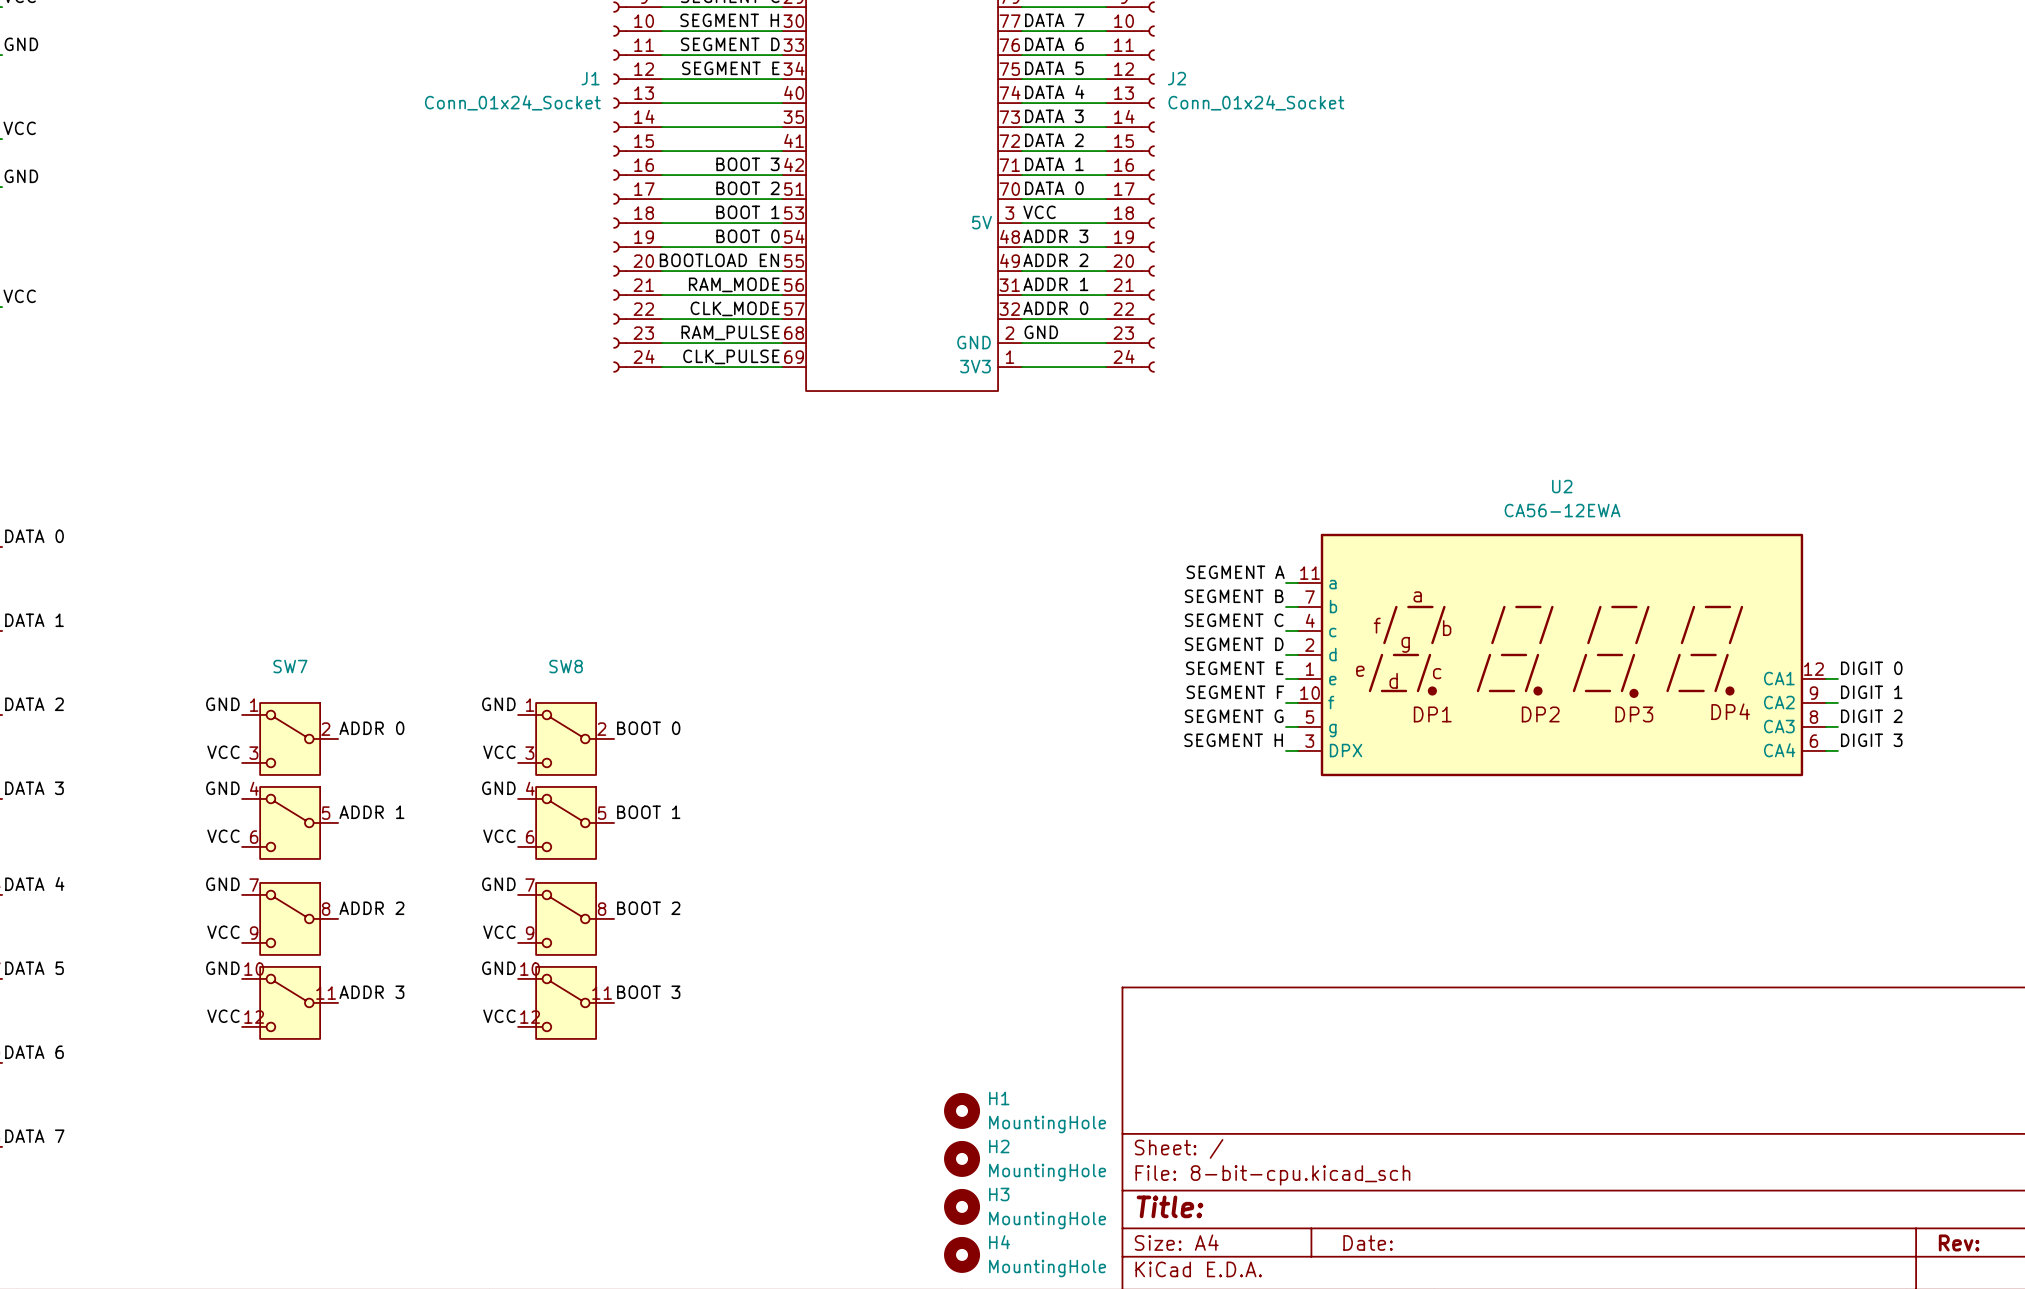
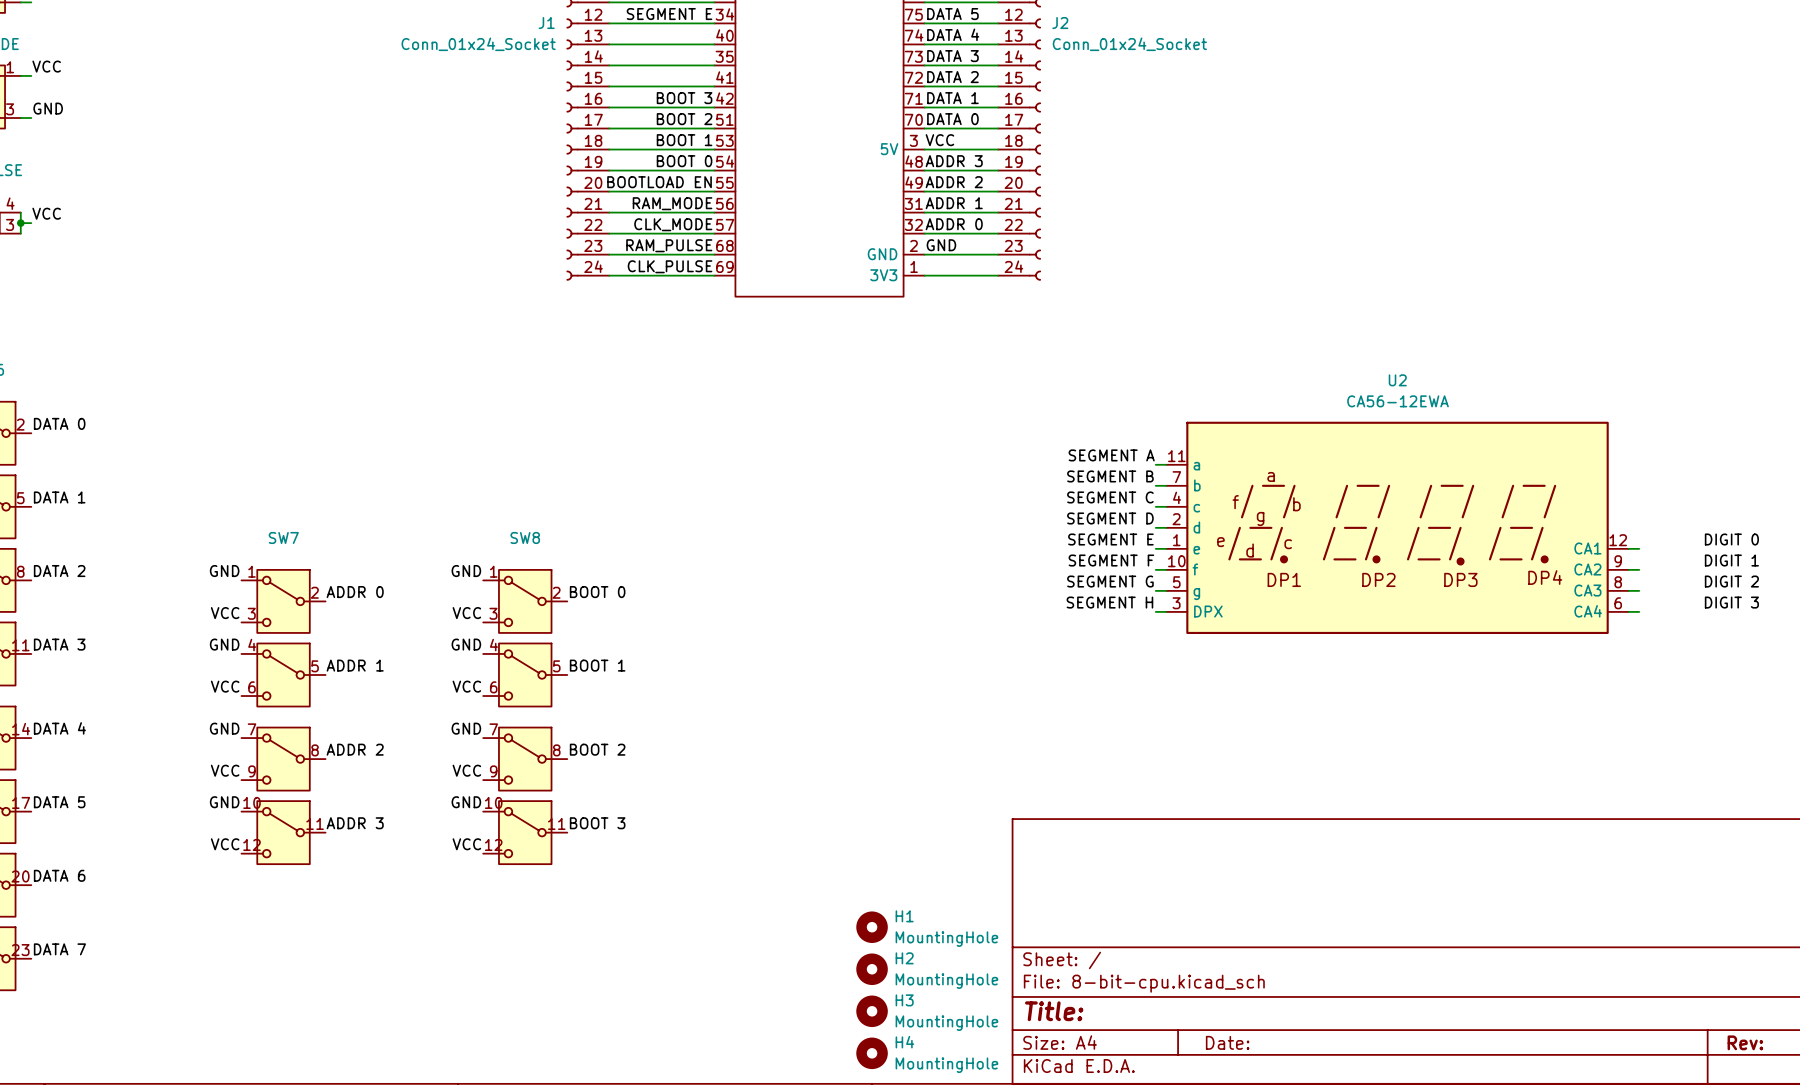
label position: DIGIT 0 (1871, 668) -> DIGIT 0 (1731, 539)
label position: DIGIT 1 (1871, 692) -> DIGIT 1 (1731, 560)
label position: DIGIT 2 (1871, 716) -> DIGIT 2 (1731, 581)
label position: DIGIT 3 (1871, 740) -> DIGIT 3 (1731, 602)

